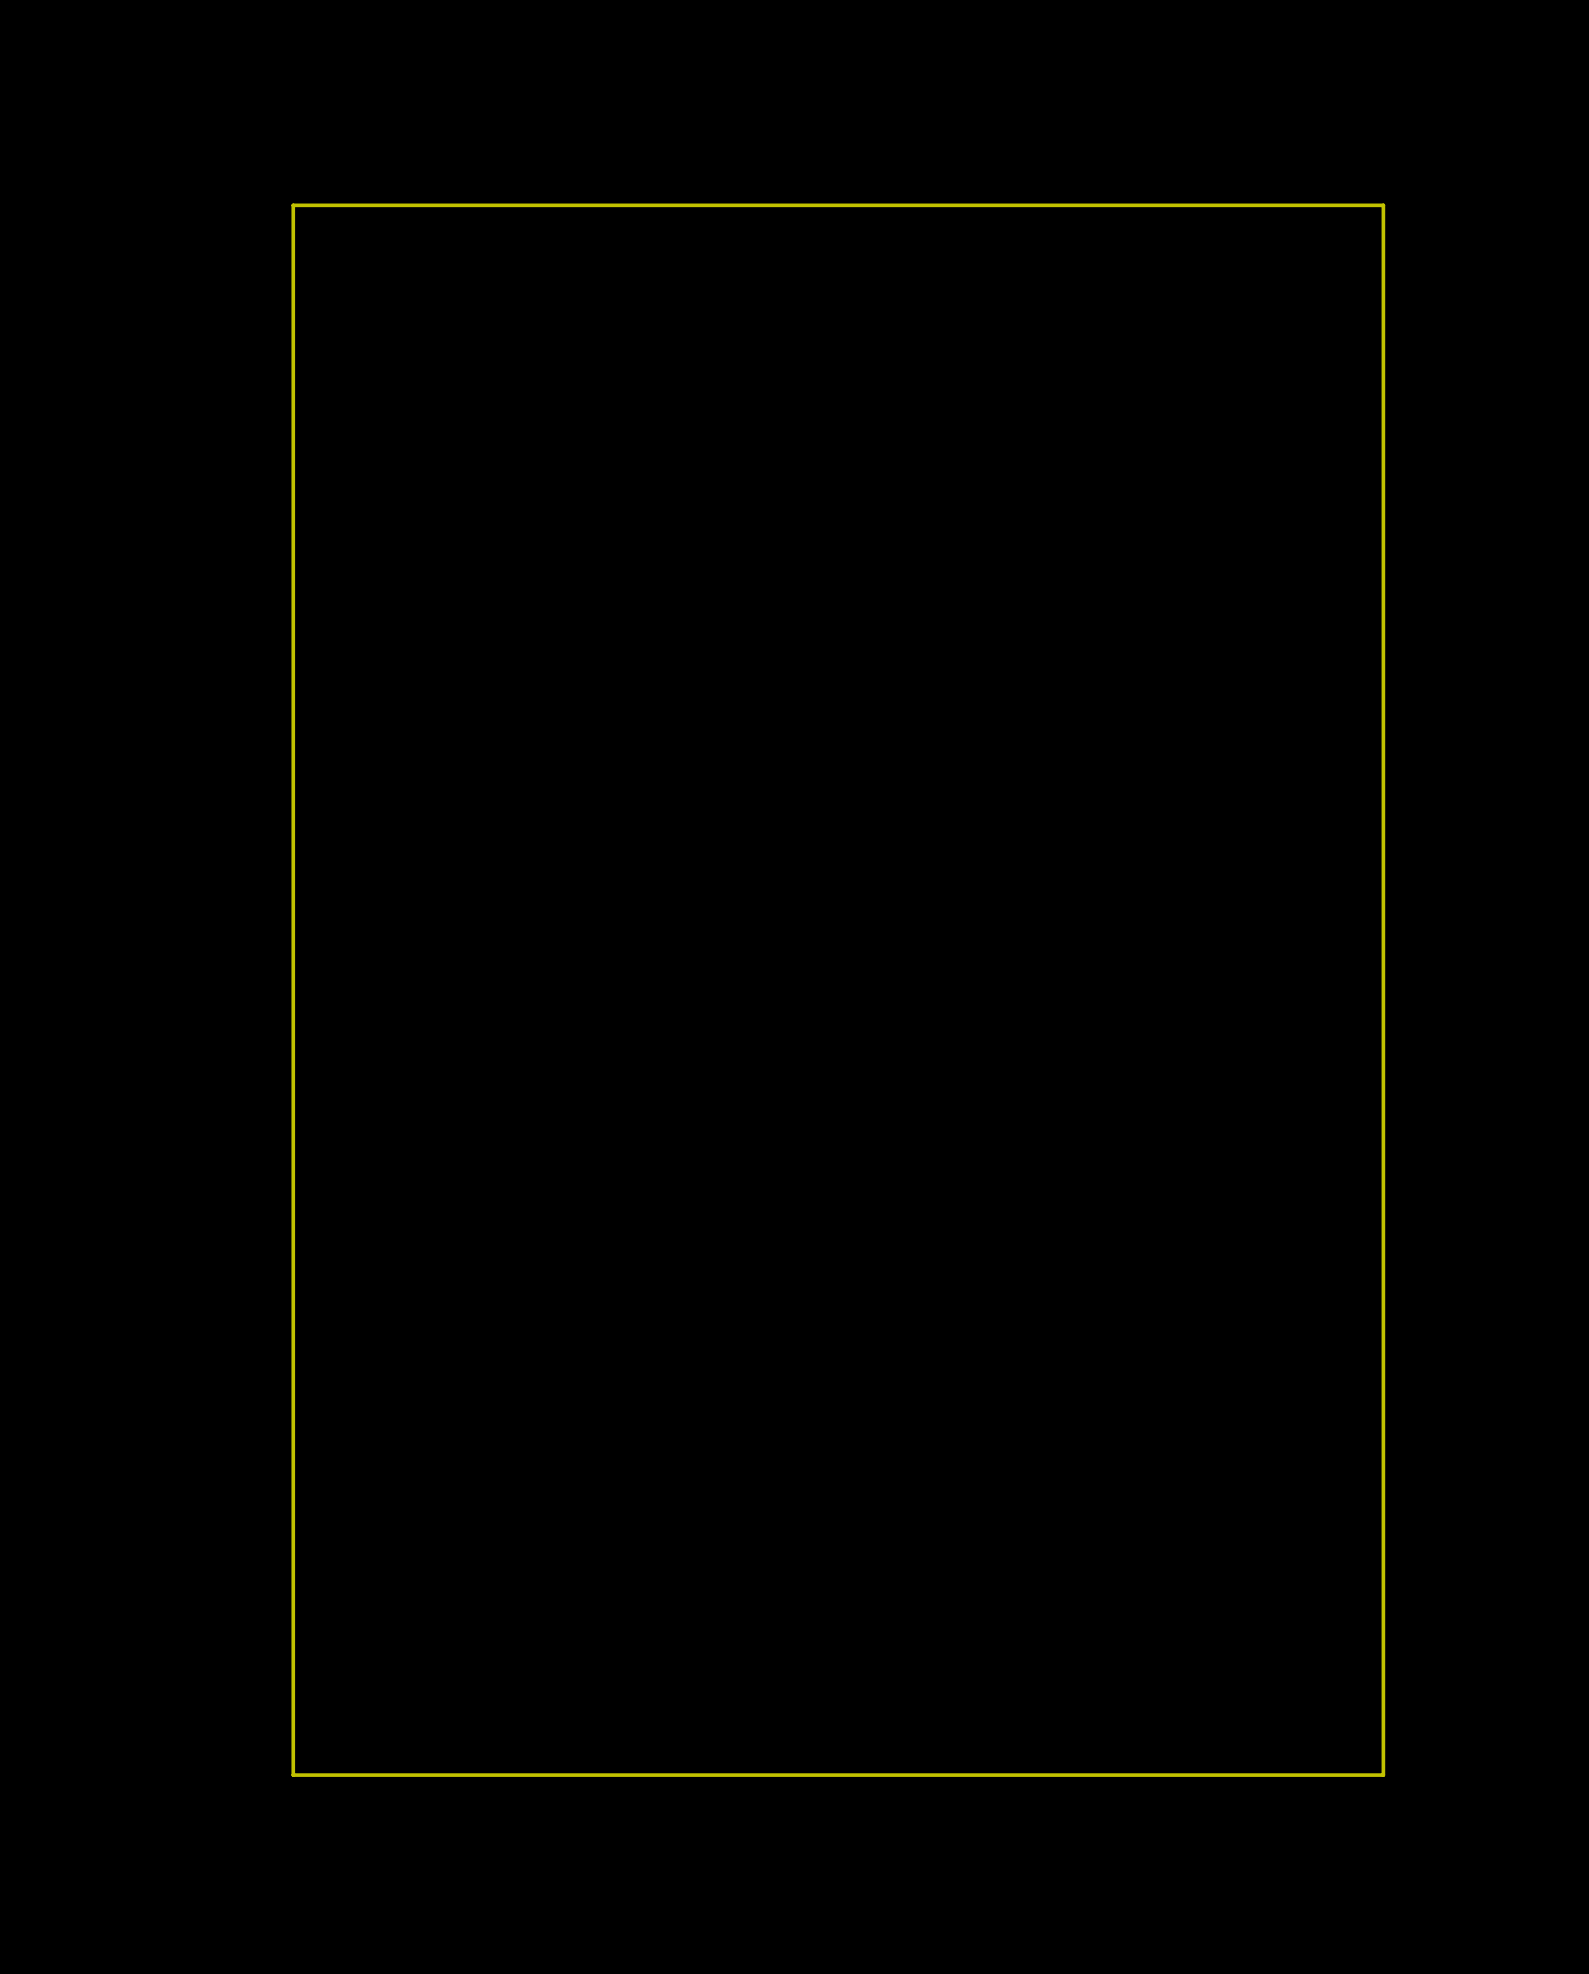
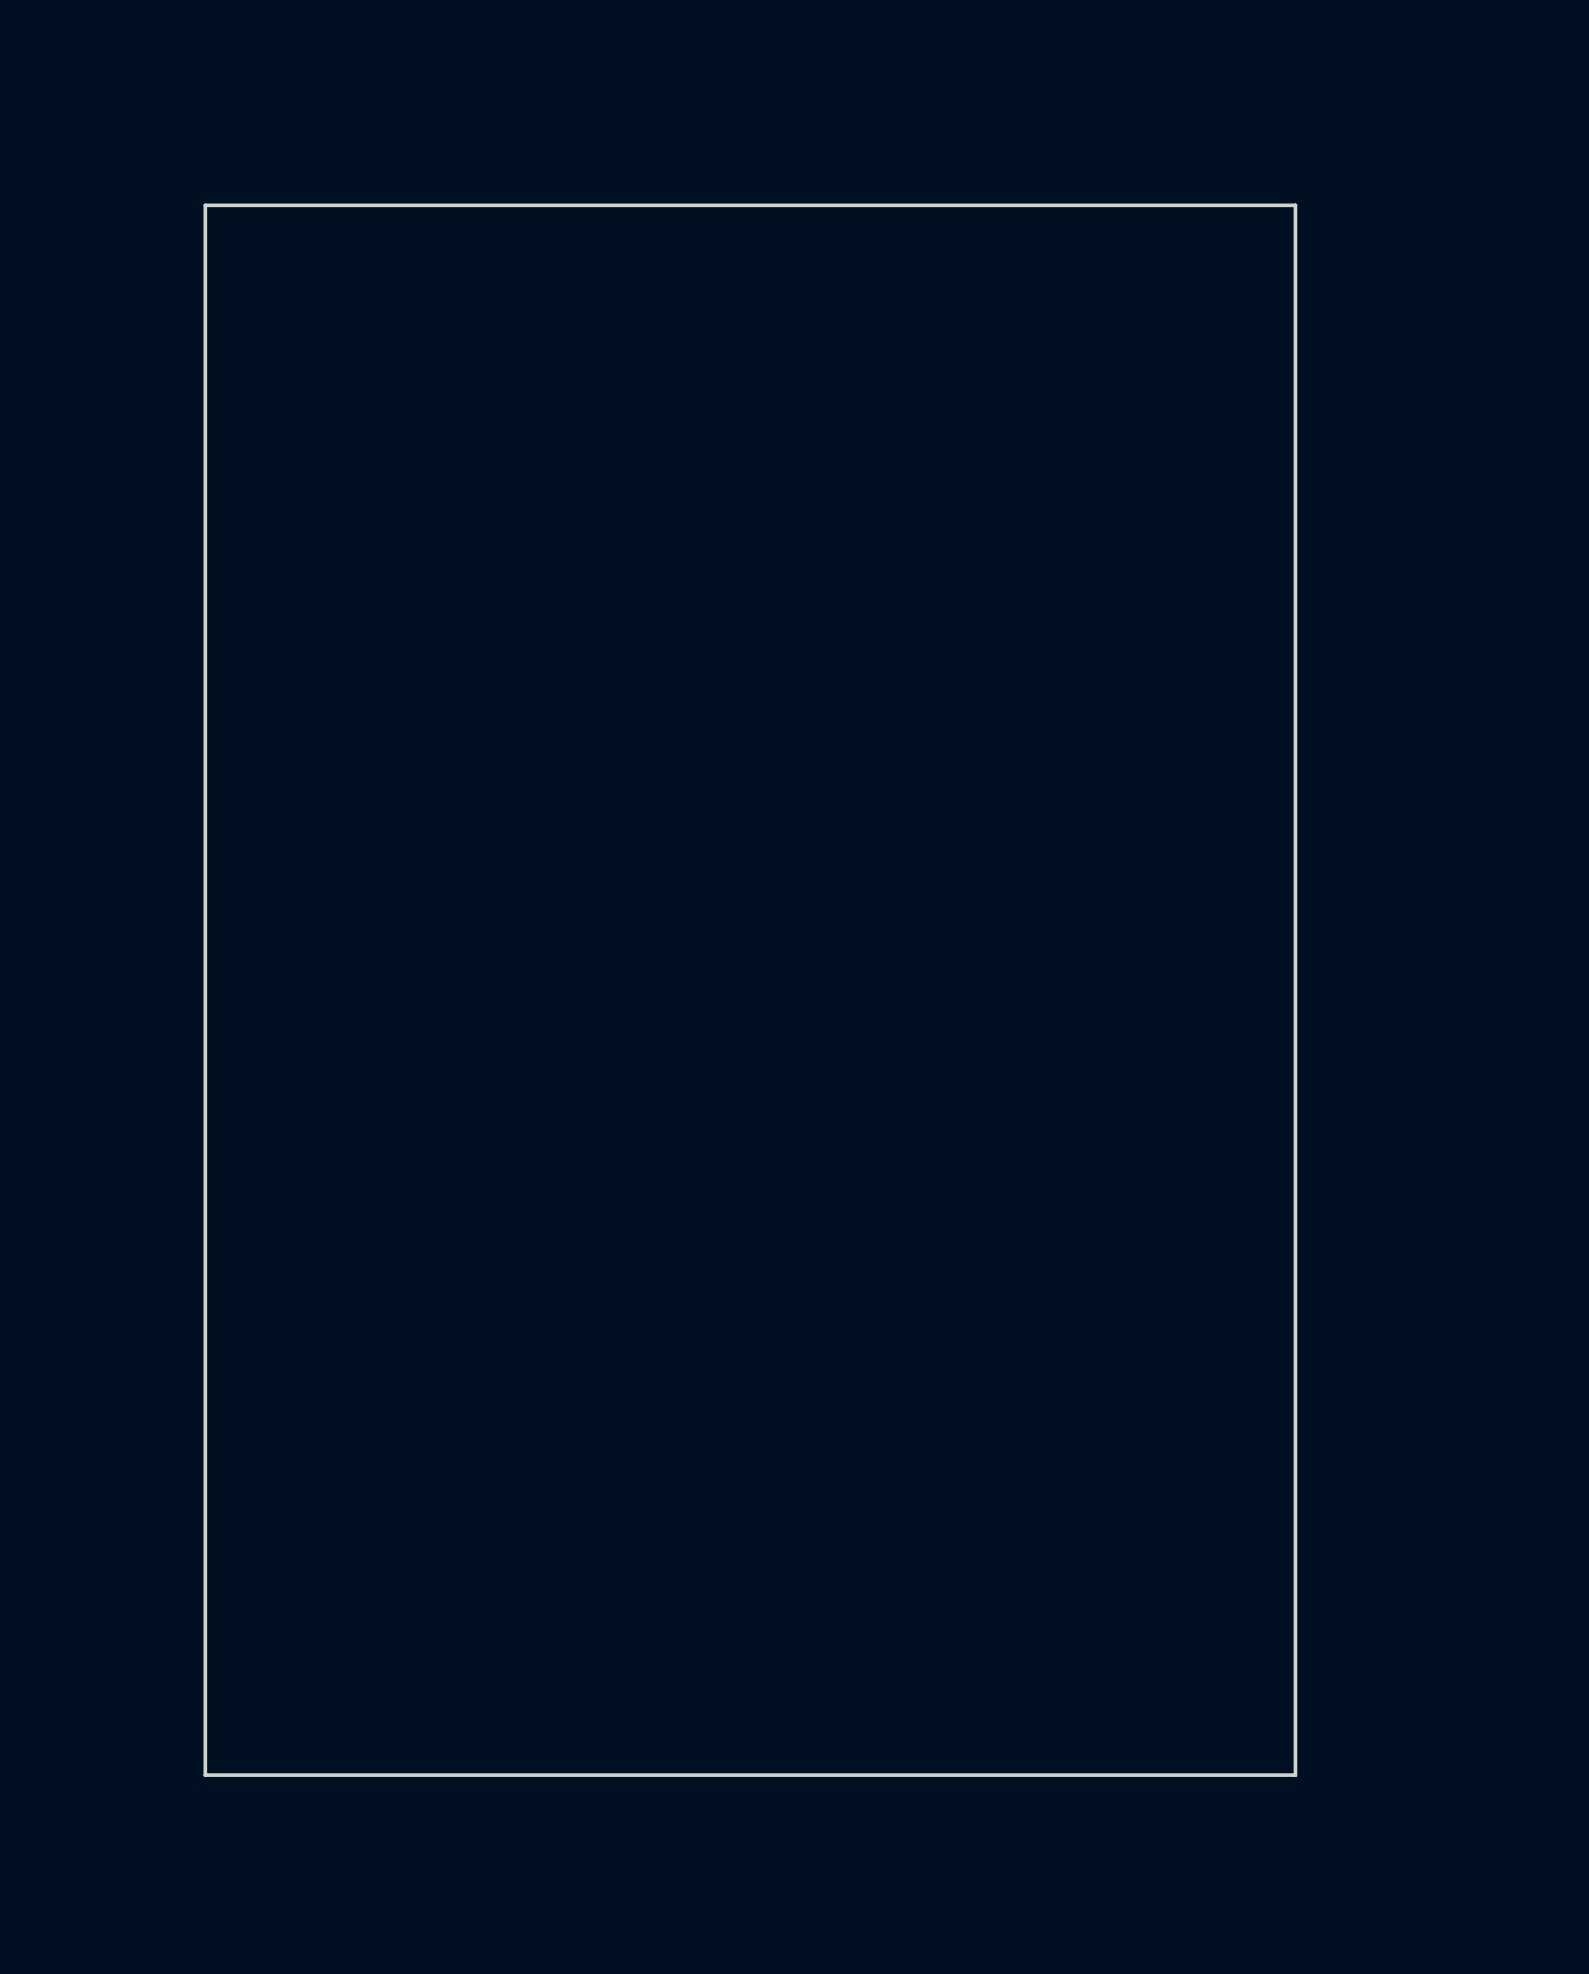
board edge: (293, 205) (293, 1775) -> (293, 205) (205, 205) (205, 1775) (293, 1775)
board edge: (1295, 205) (1383, 205) (1383, 1775) (1295, 1775) -> (1295, 205) (1295, 1775)

